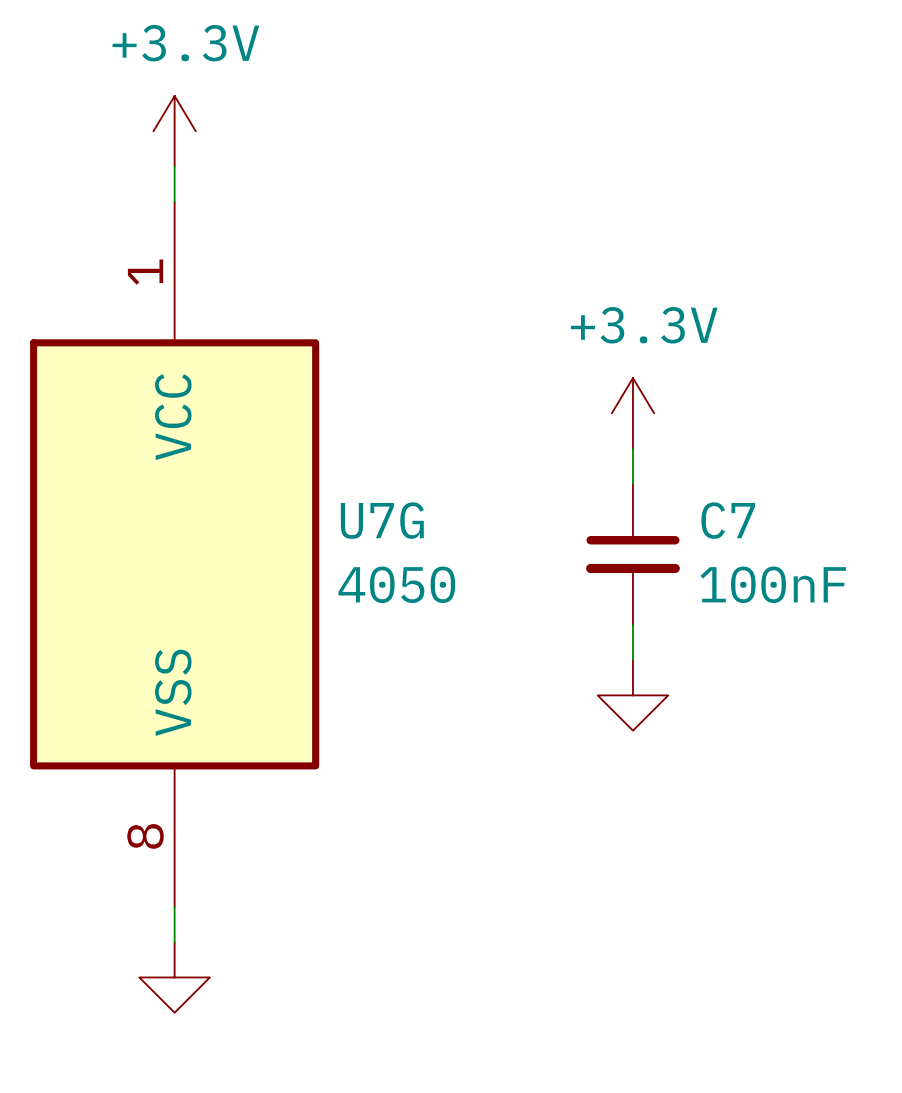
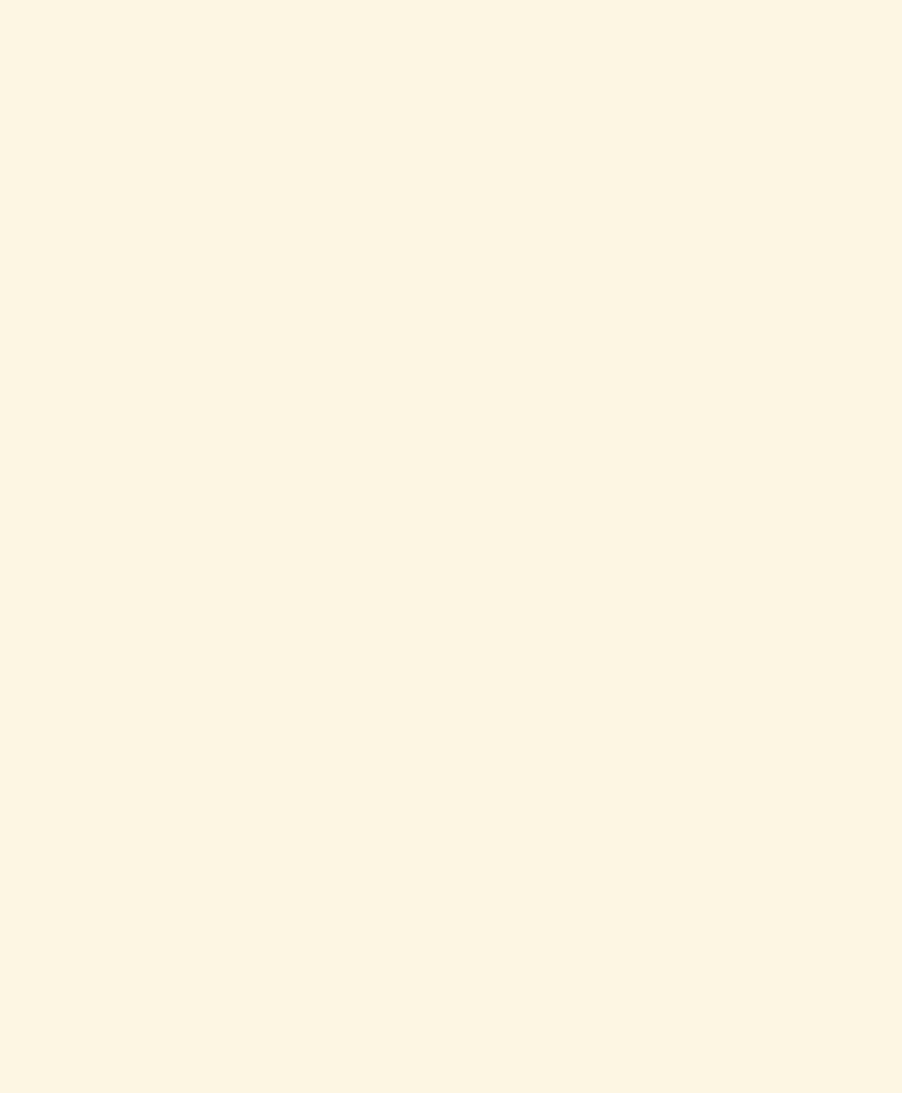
power symbol: +3.3V (174, 131) -> none
wire: (174, 166) (174, 201) -> none
power symbol: +3.3V (632, 413) -> none
wire: (632, 448) (632, 483) -> none
U7G: 4050 (174, 554) -> none
C7: 100nF (632, 554) -> none
wire: (632, 624) (632, 660) -> none
power symbol: (632, 695) -> none
wire: (174, 906) (174, 942) -> none
power symbol: (174, 977) -> none

